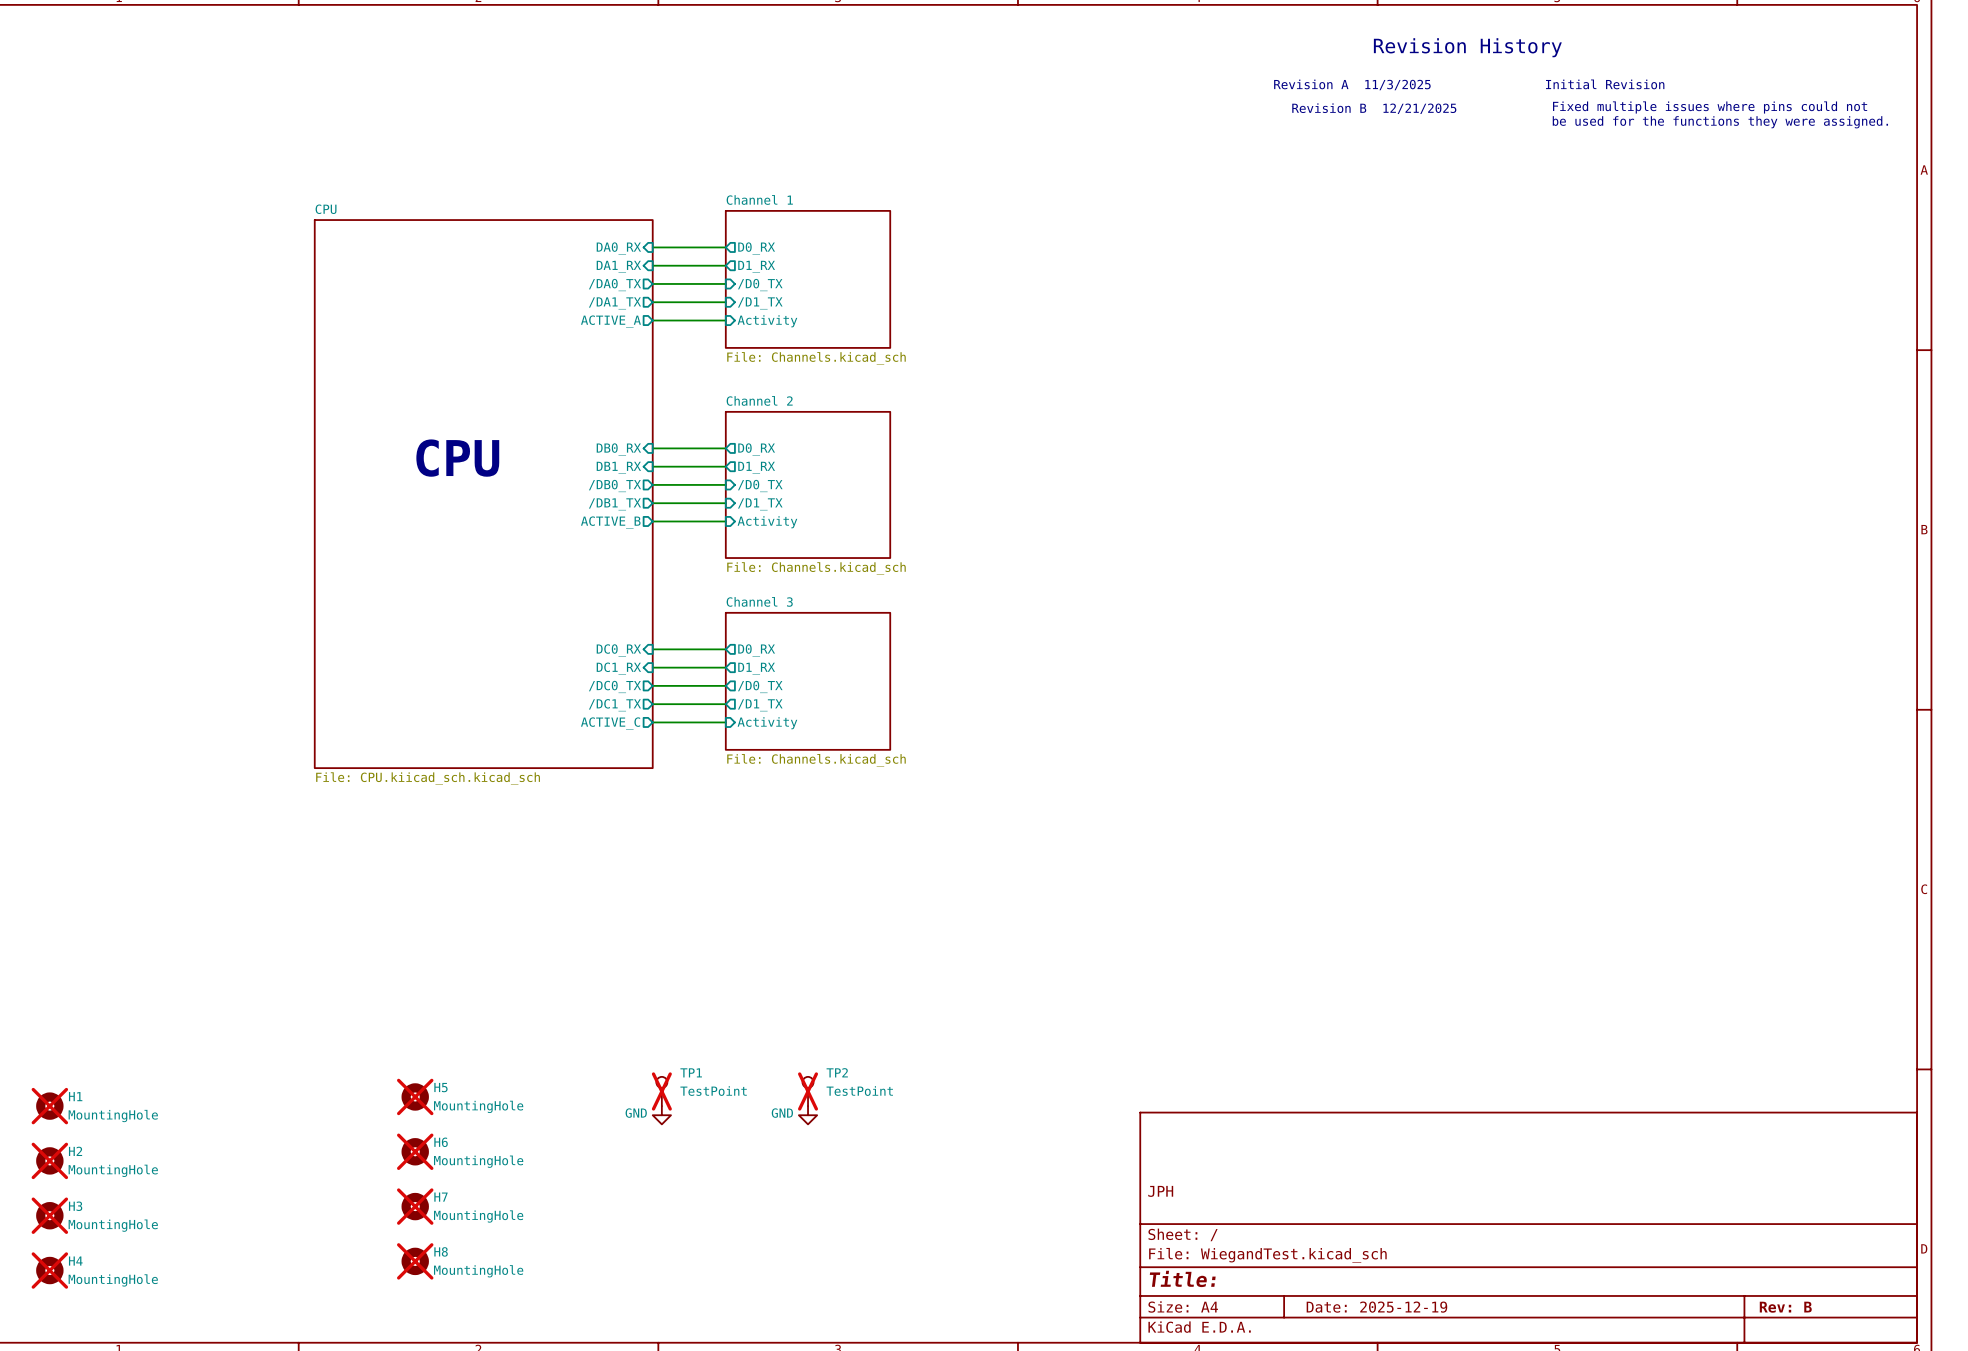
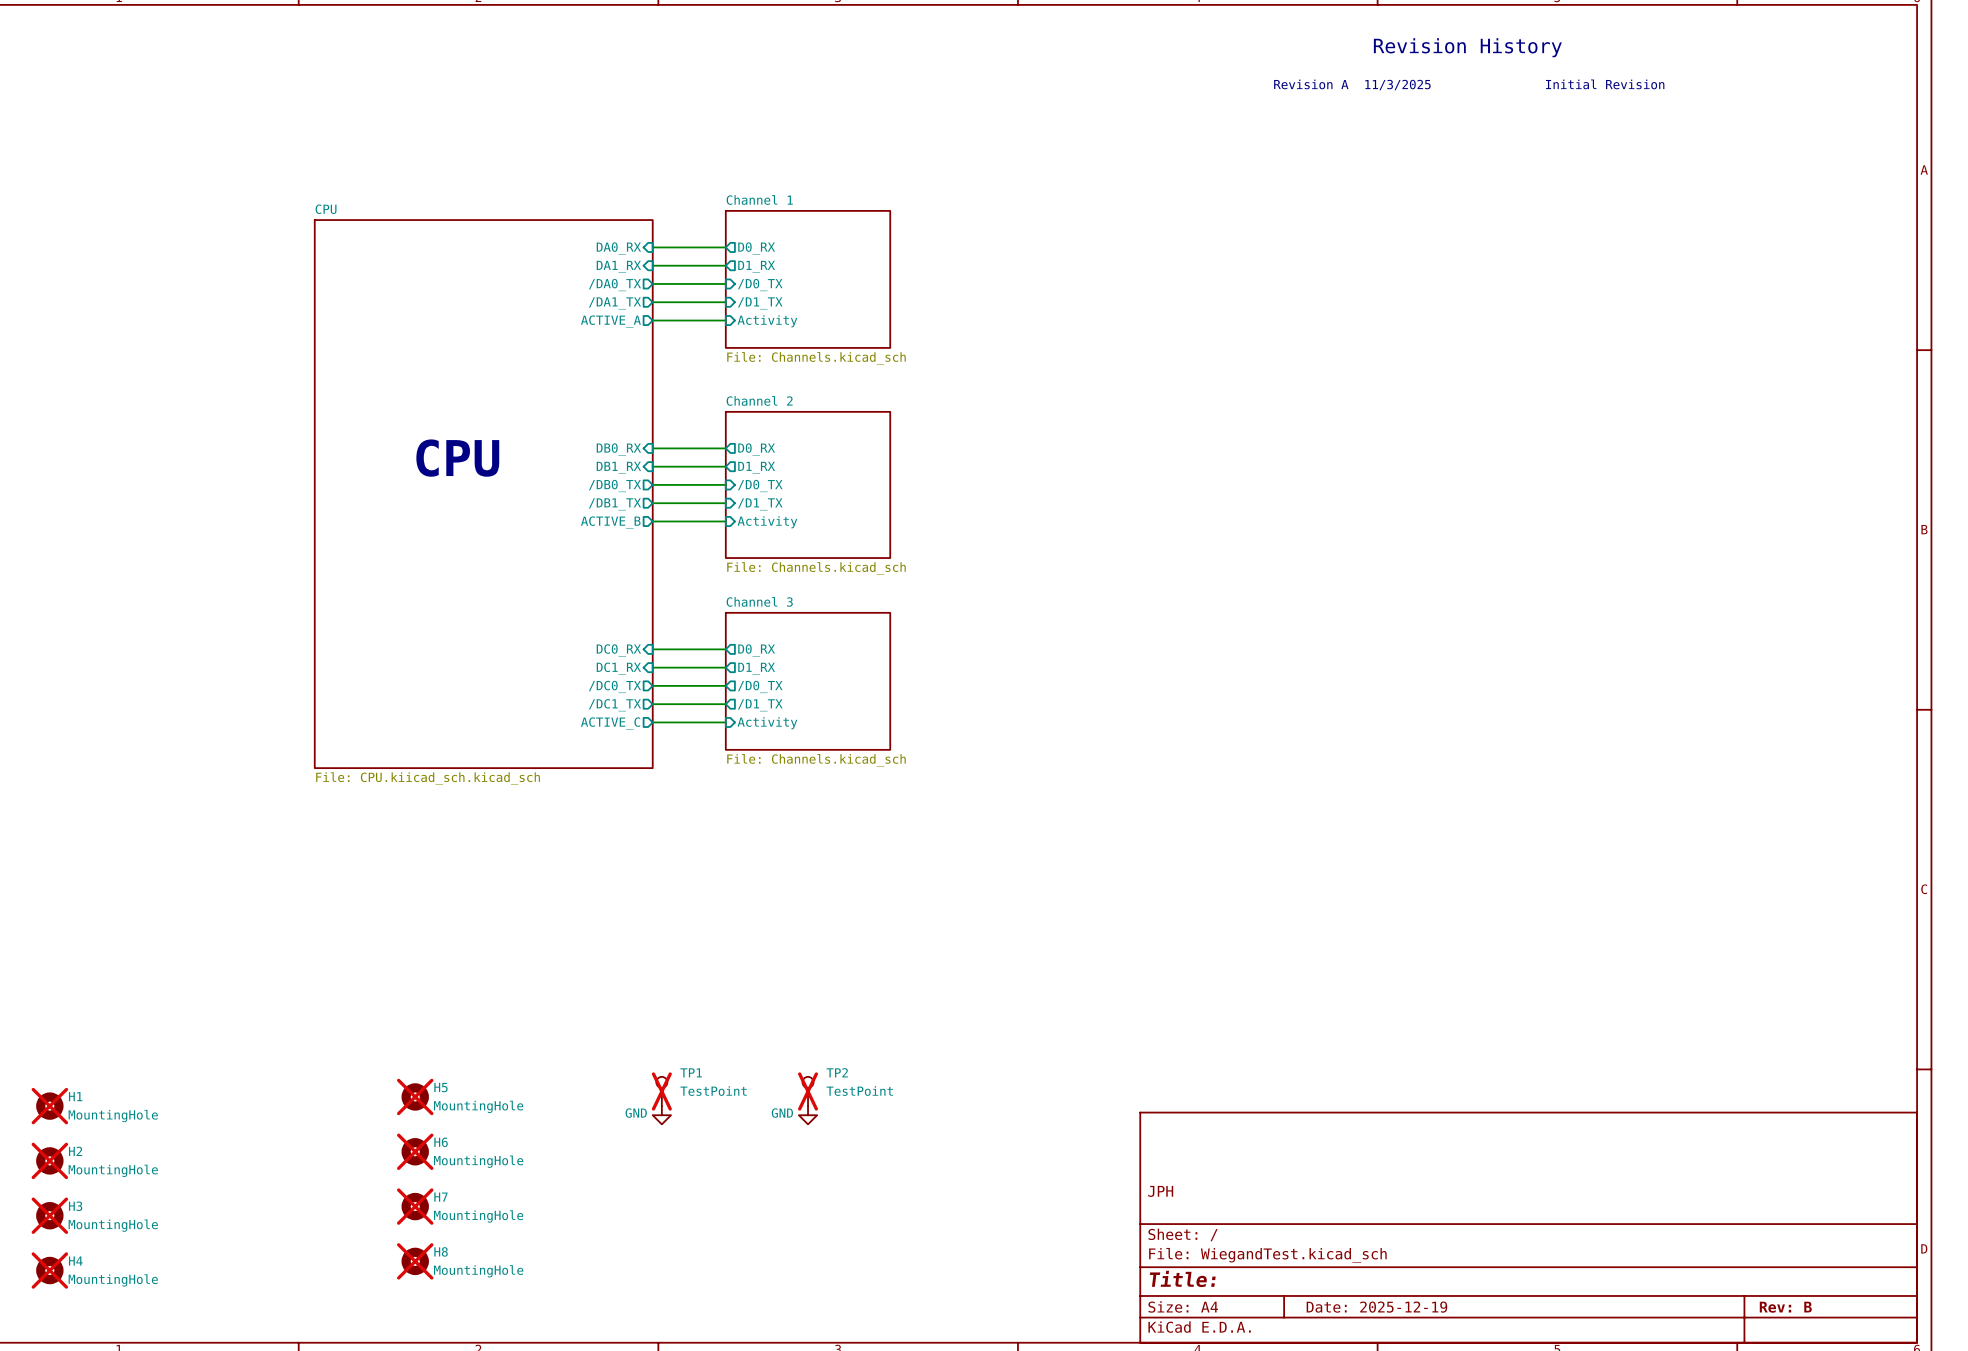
text: Fixed multiple issues where pins could not (1710, 107) -> none
text: Revision B 12/21/2025 (1374, 108) -> none
text: be used for the functions they were assigned. (1720, 122) -> none

